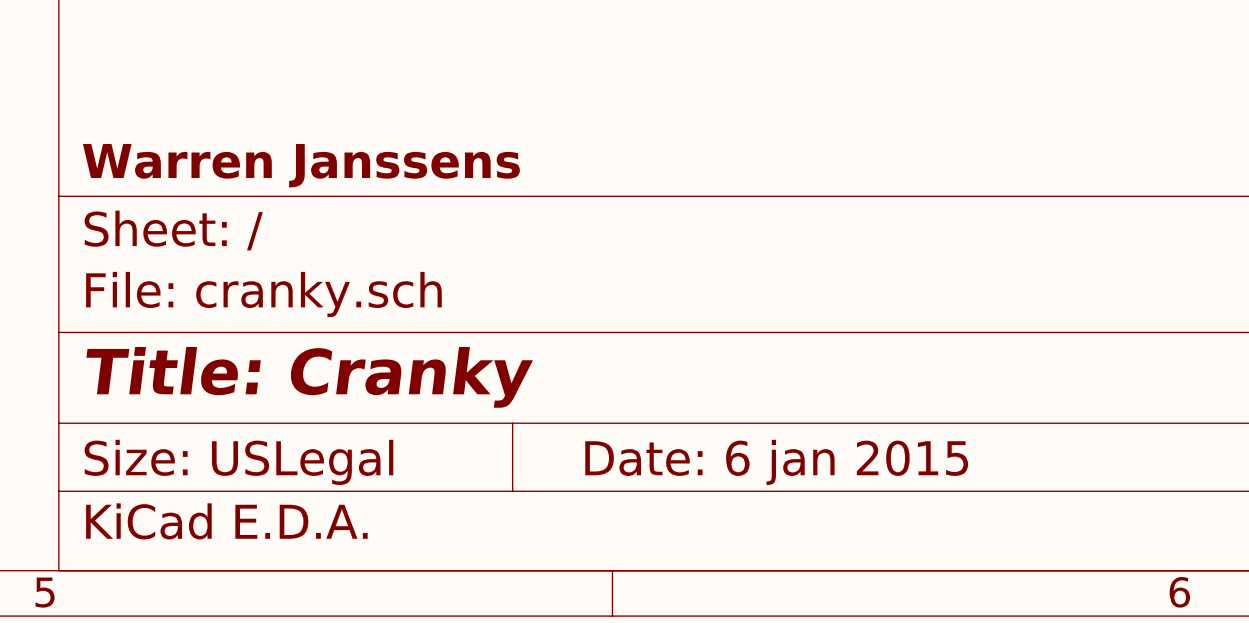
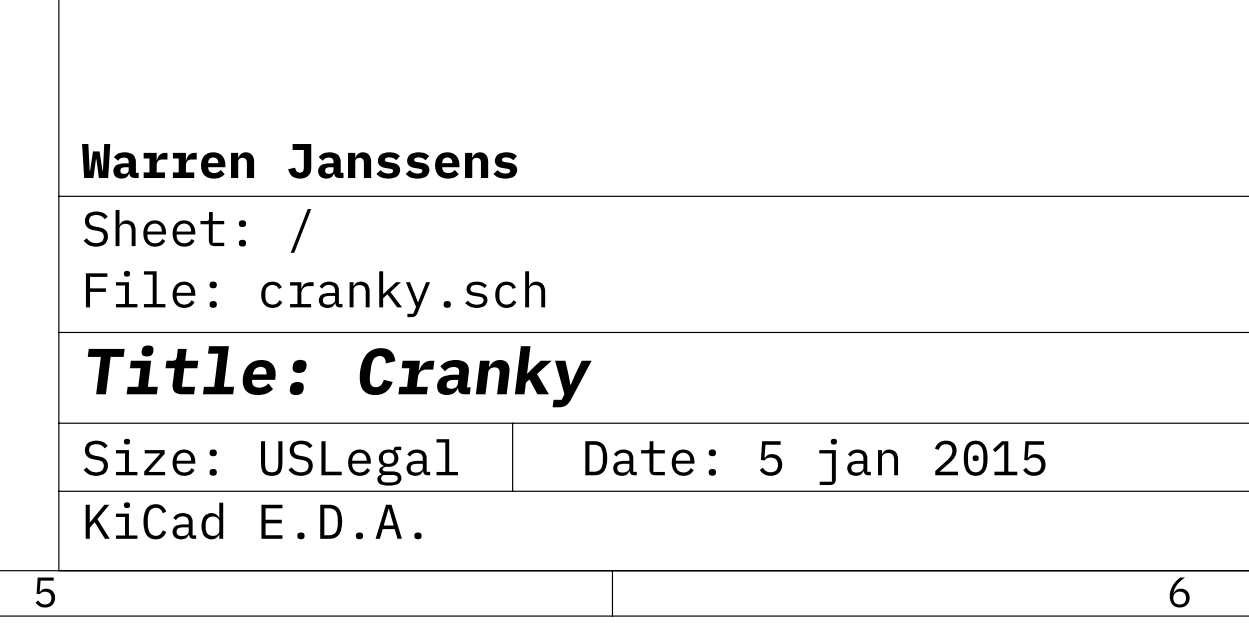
title block: Date: 6 jan 2015 (776, 462) -> Date: 5 jan 2015 (815, 461)

